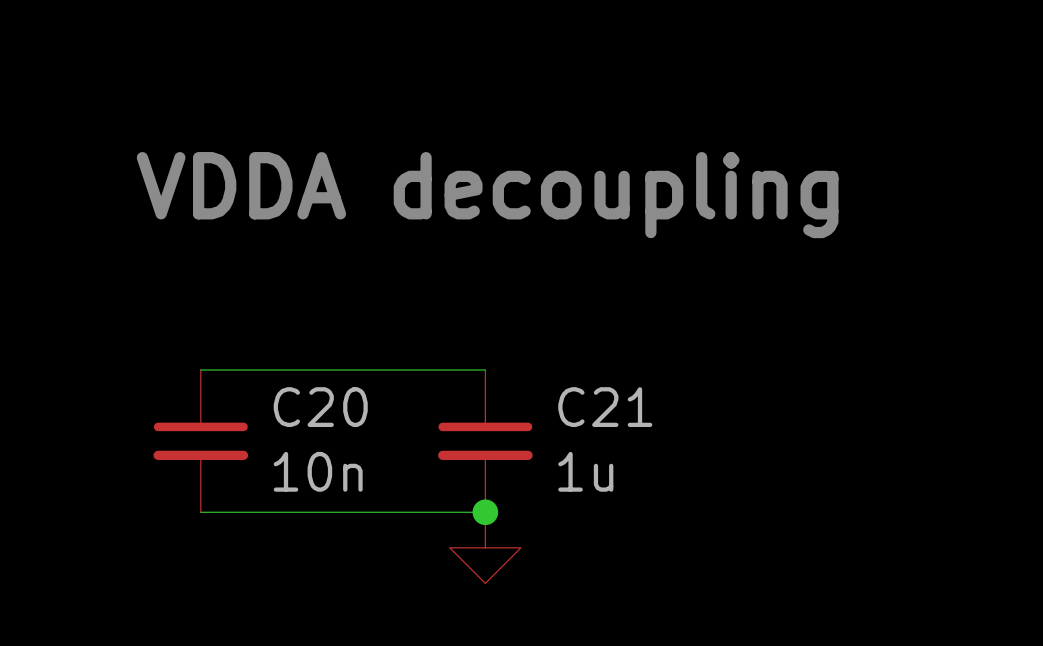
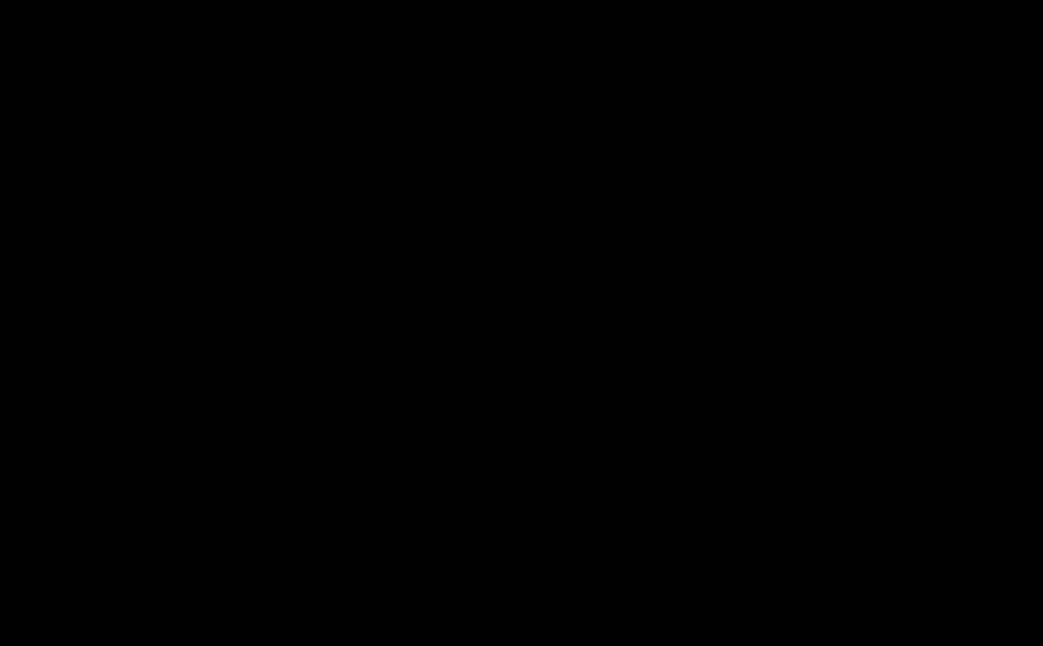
text: VDDA decoupling (487, 195) -> none
wire: (200, 369) (485, 369) -> none
C20: 10n (200, 441) -> none
C21: 1u (485, 441) -> none
wire: (200, 512) (485, 512) -> none
junction: (485, 512) -> none
power symbol: (485, 547) -> none

